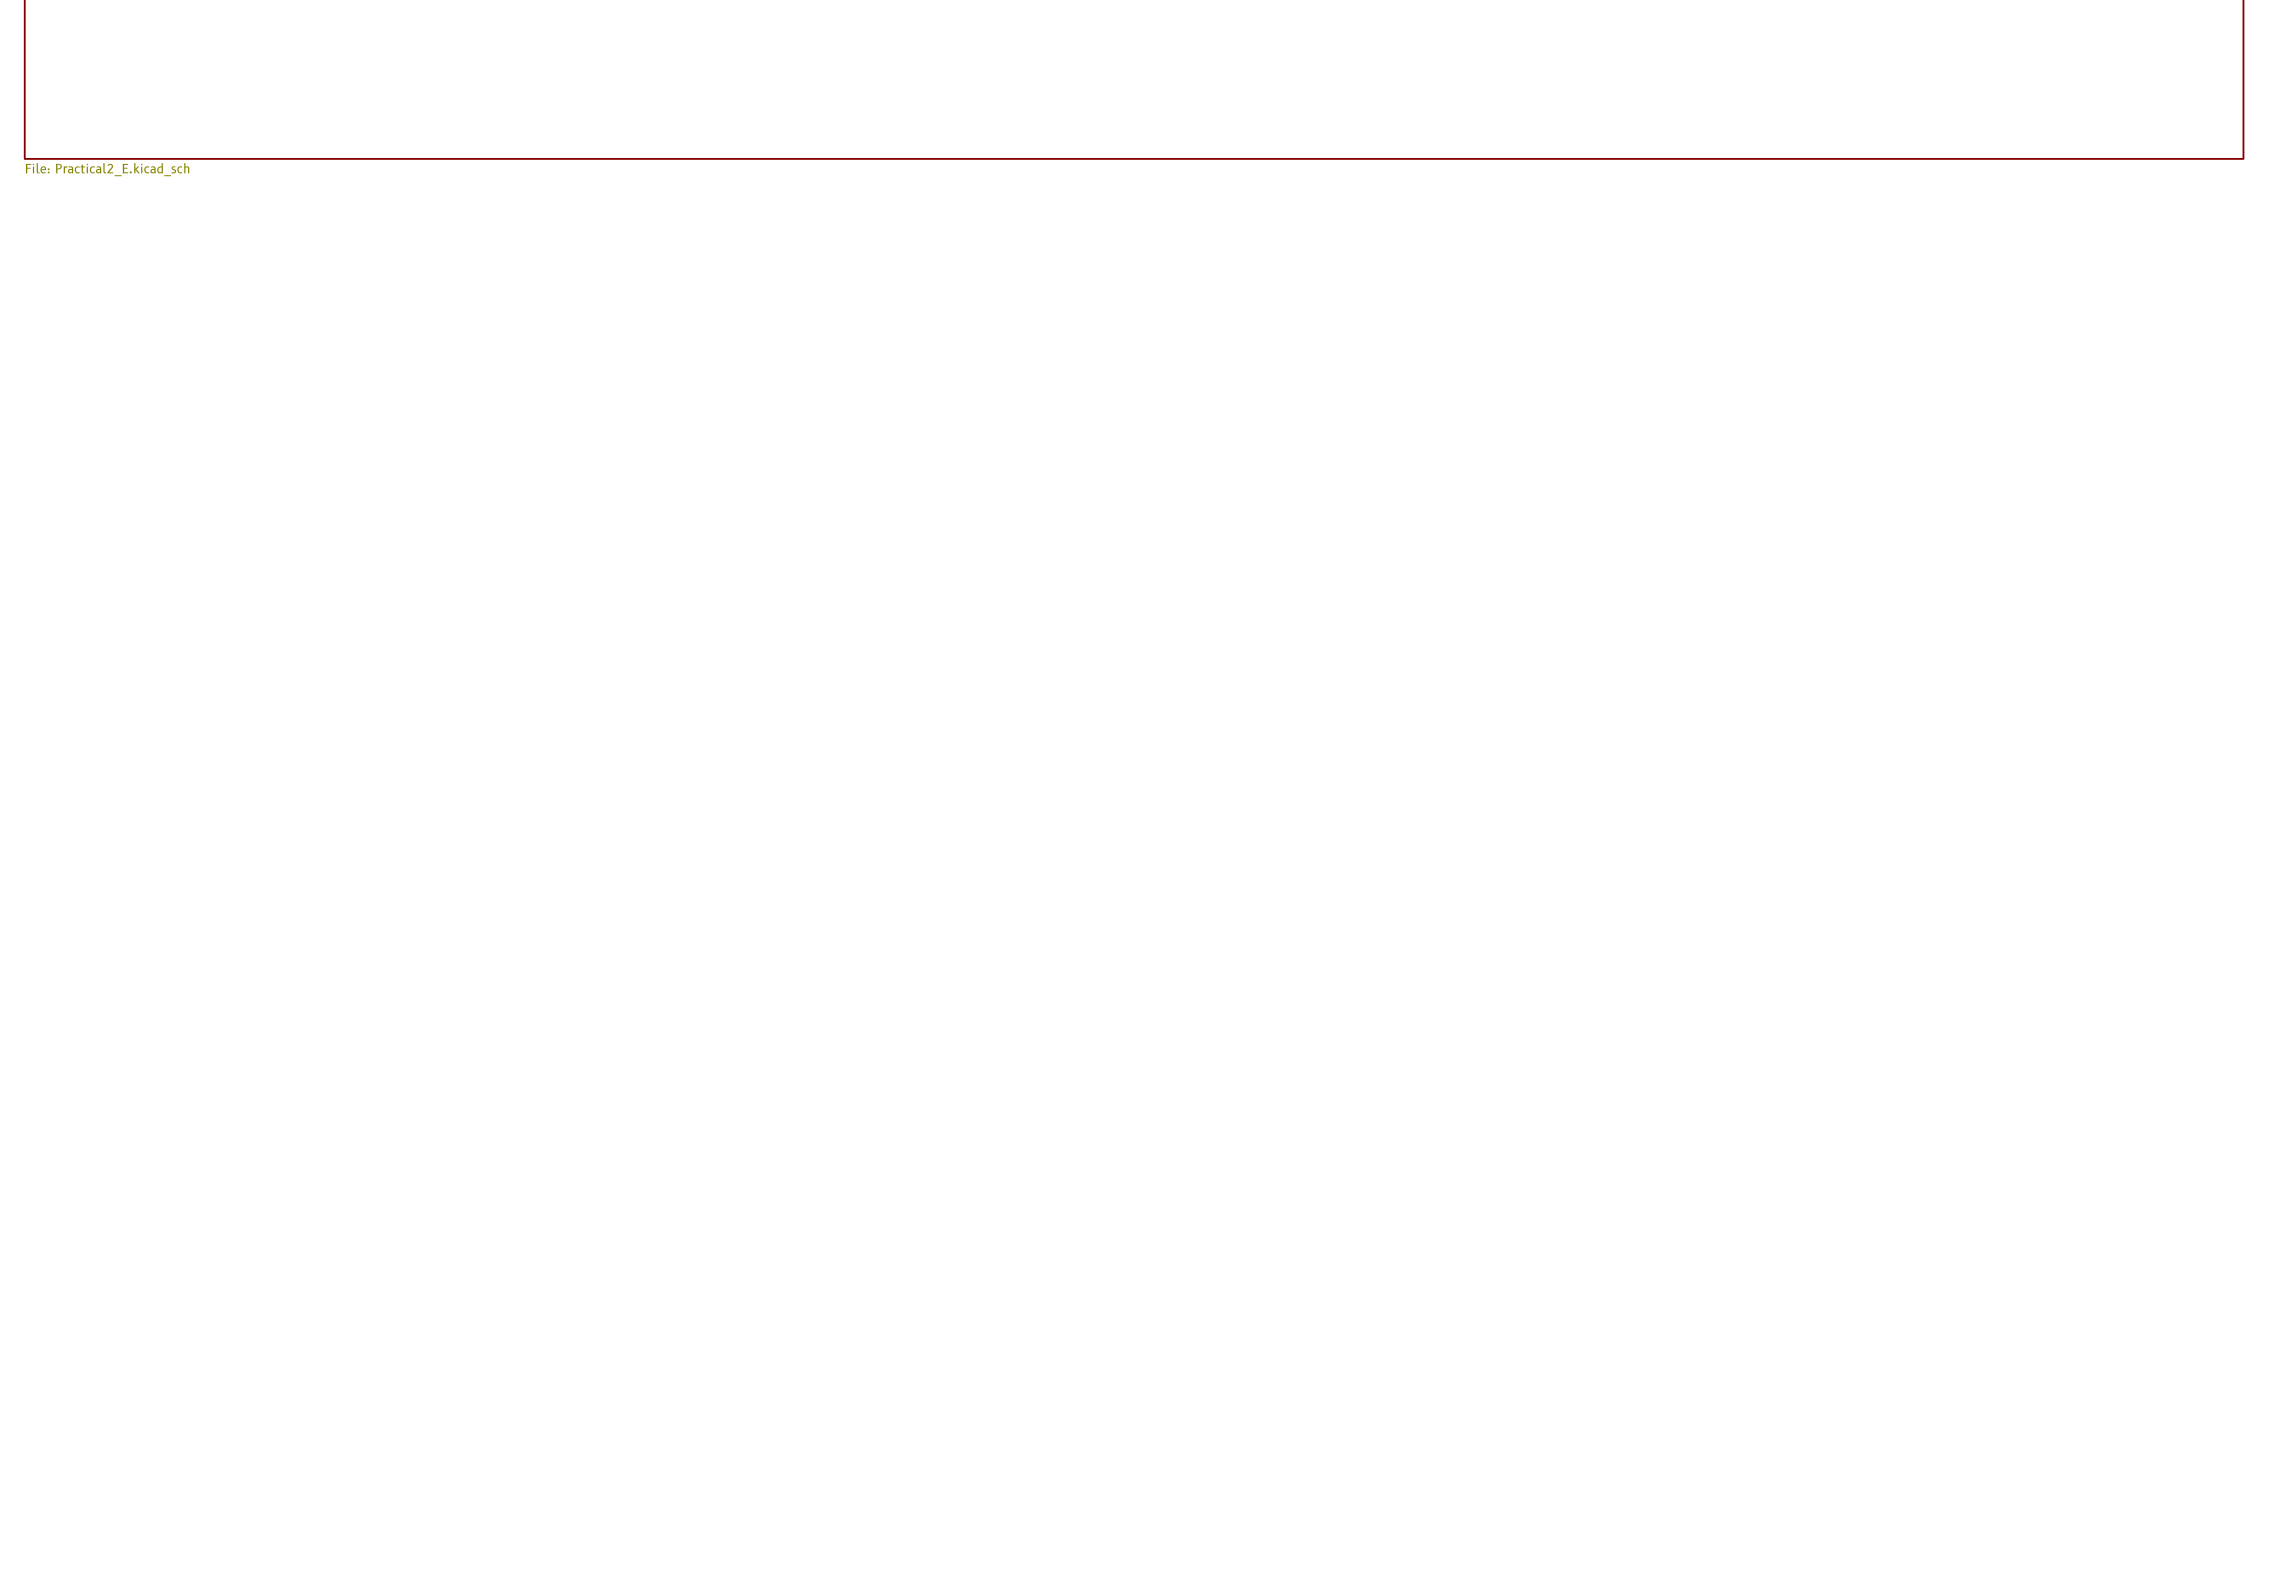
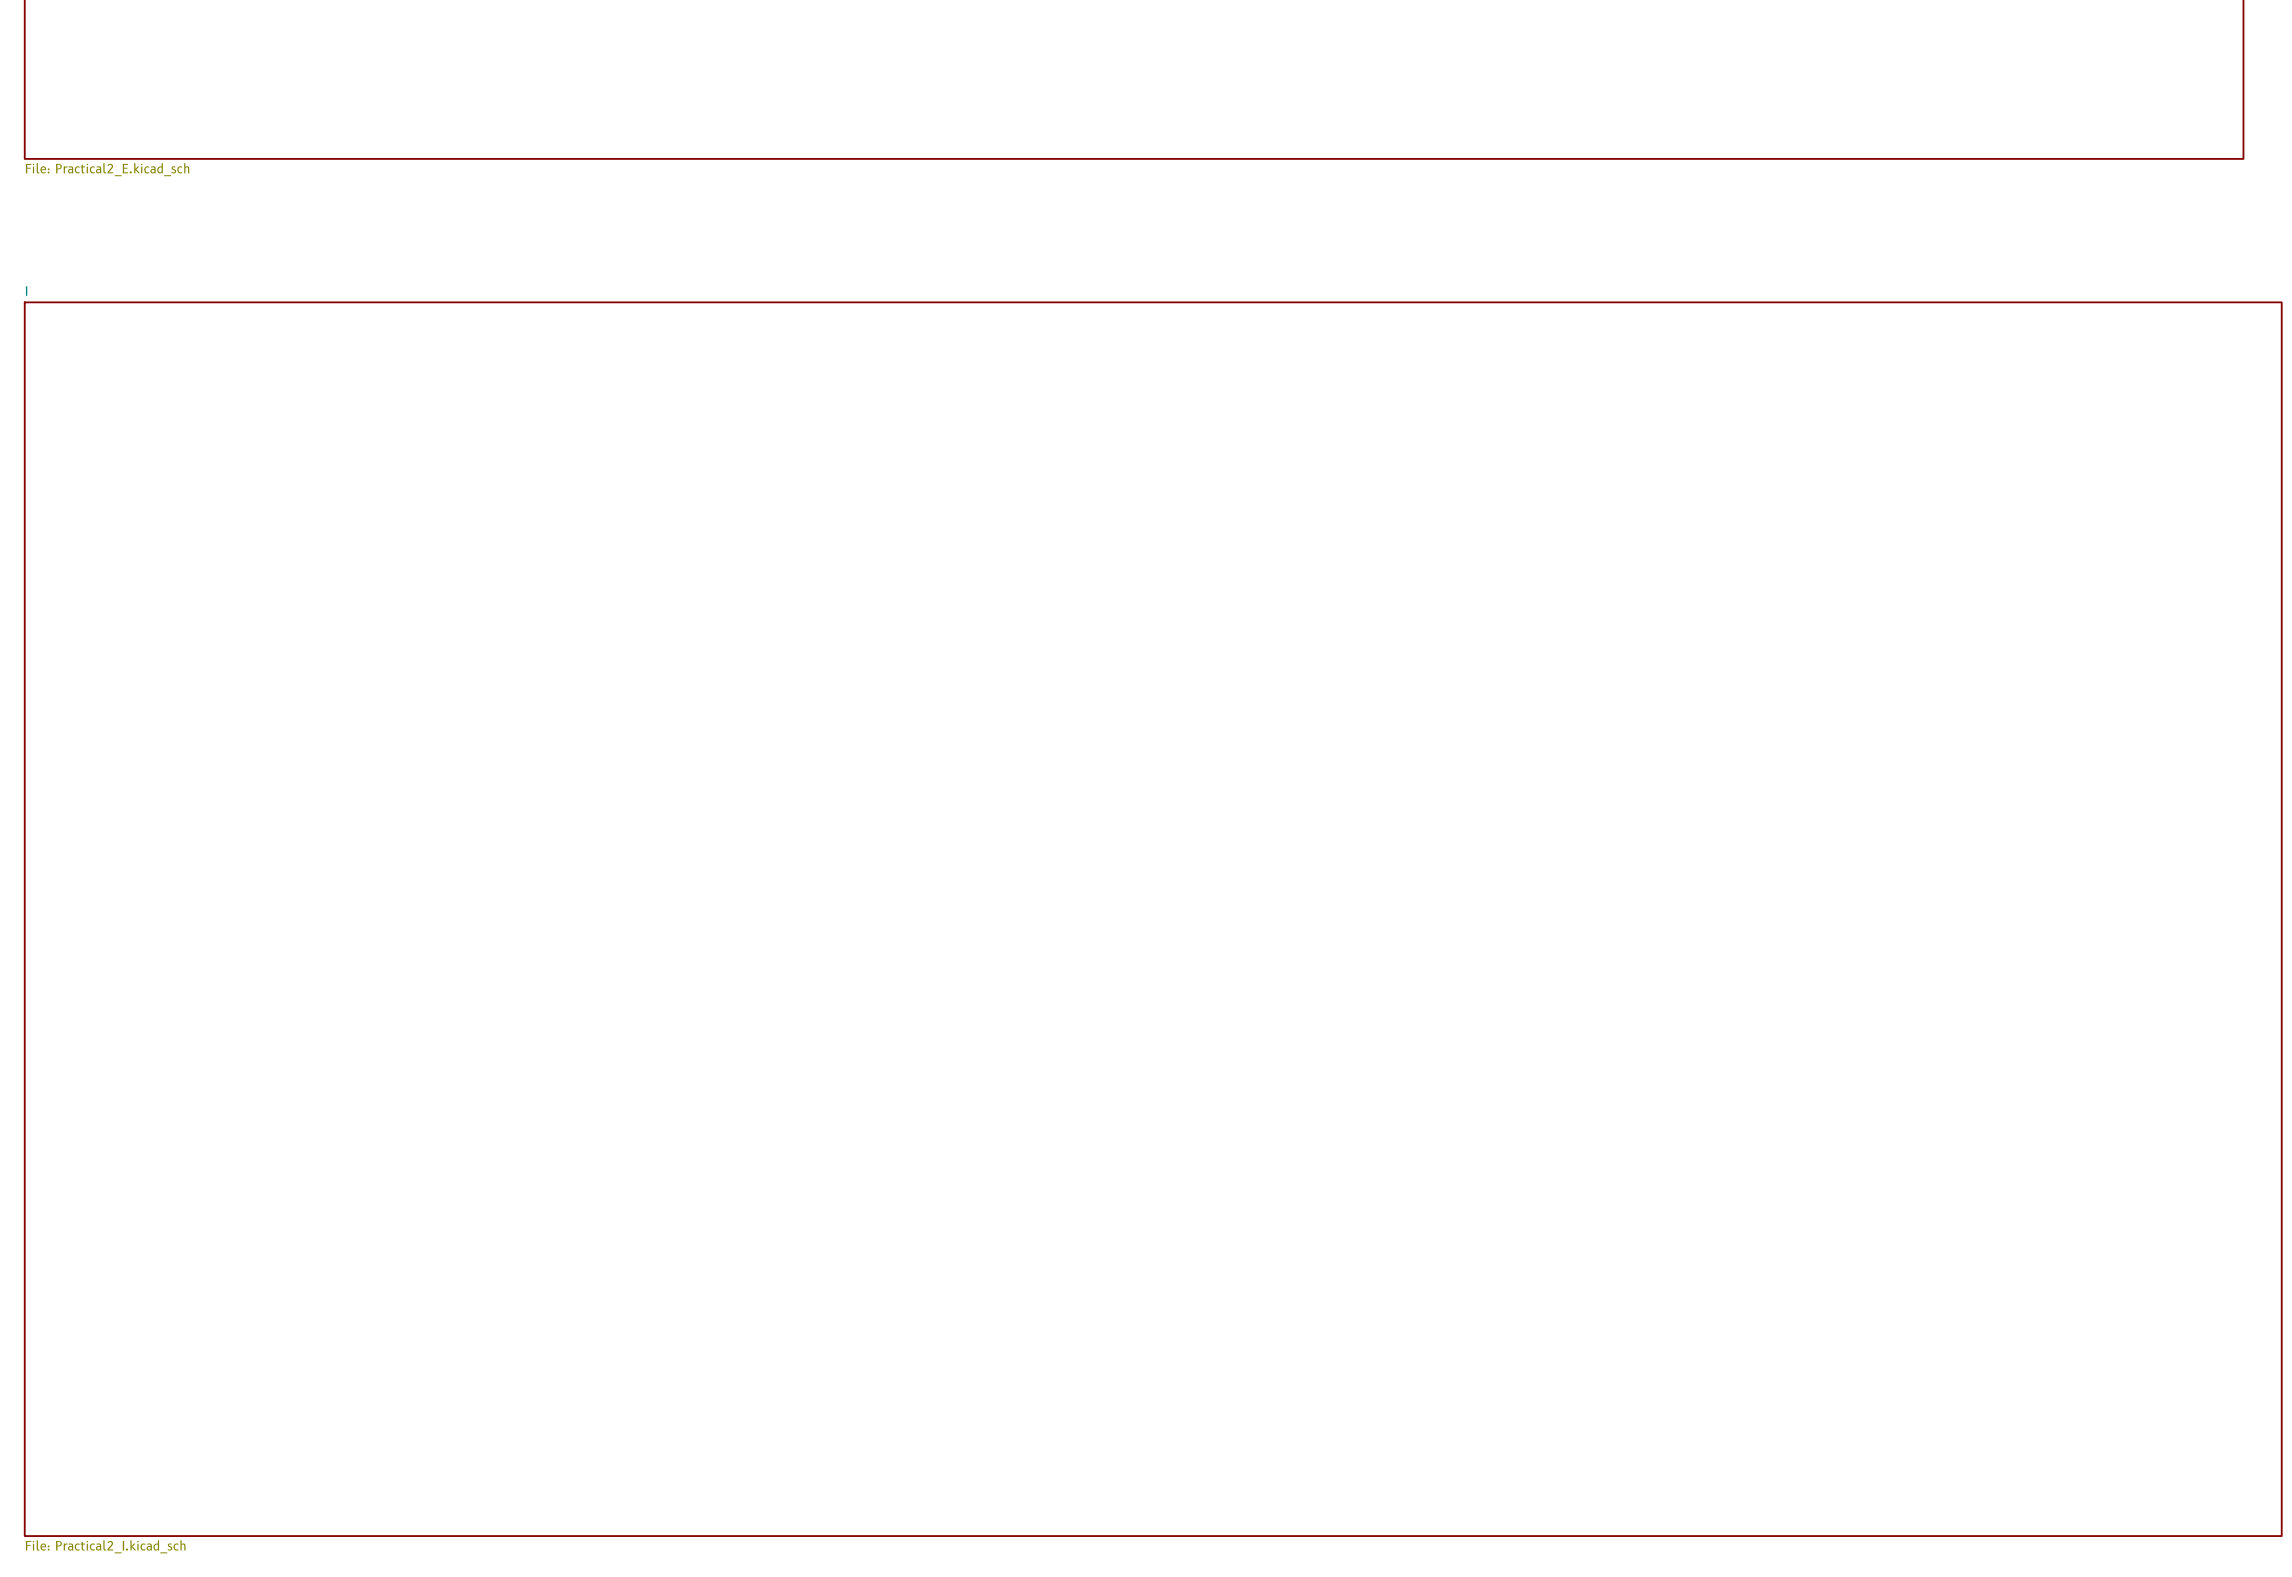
sheet I: none -> File: Practical2_I.kicad_sch (1153, 919)

